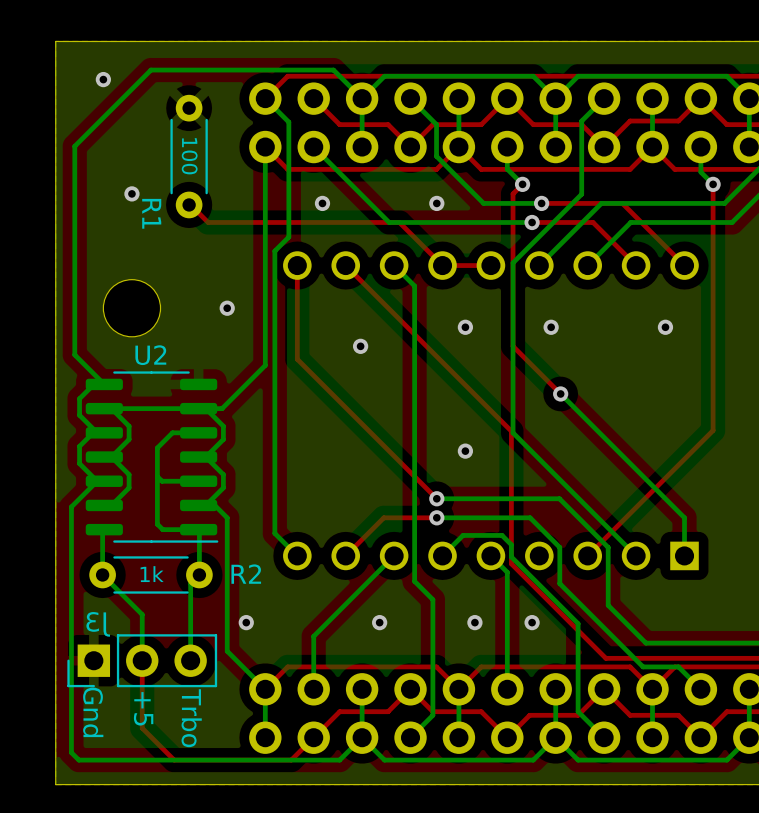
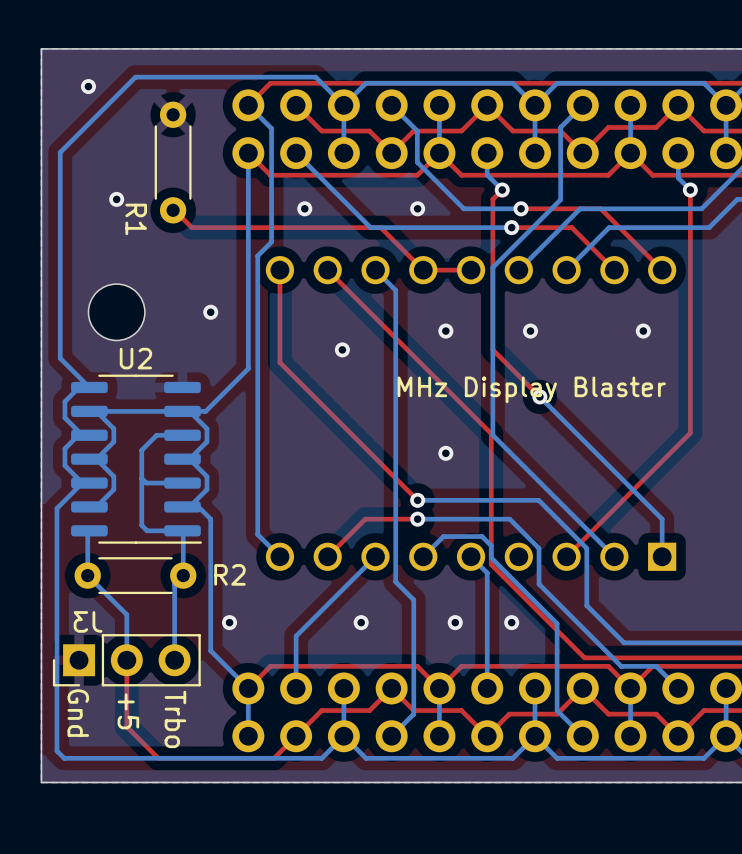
text: 100 (189, 156) -> none
text: none -> MHz Display Blaster (531, 389)
text: 1k (152, 574) -> none

